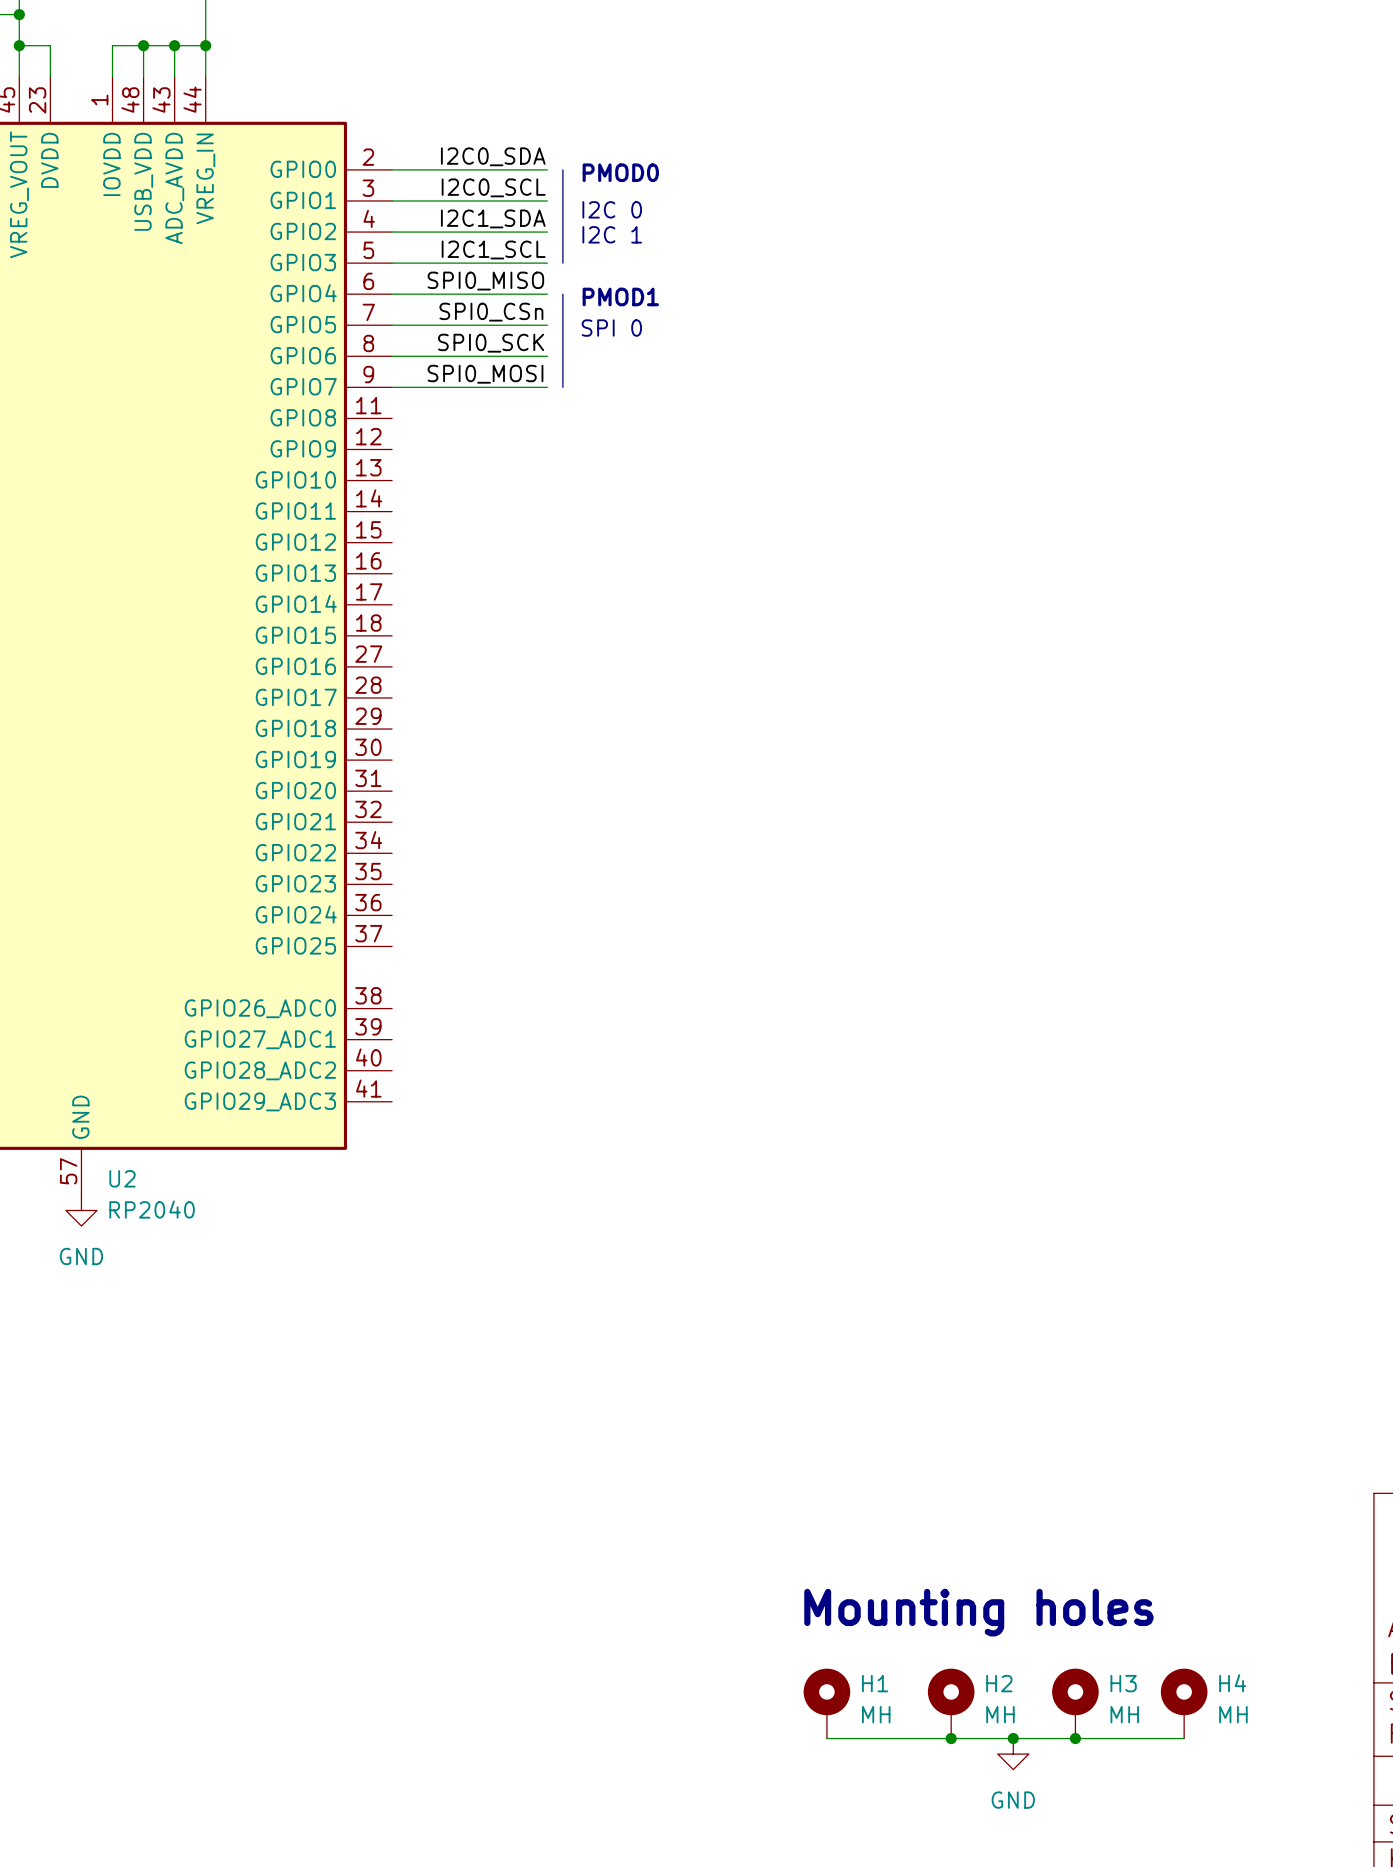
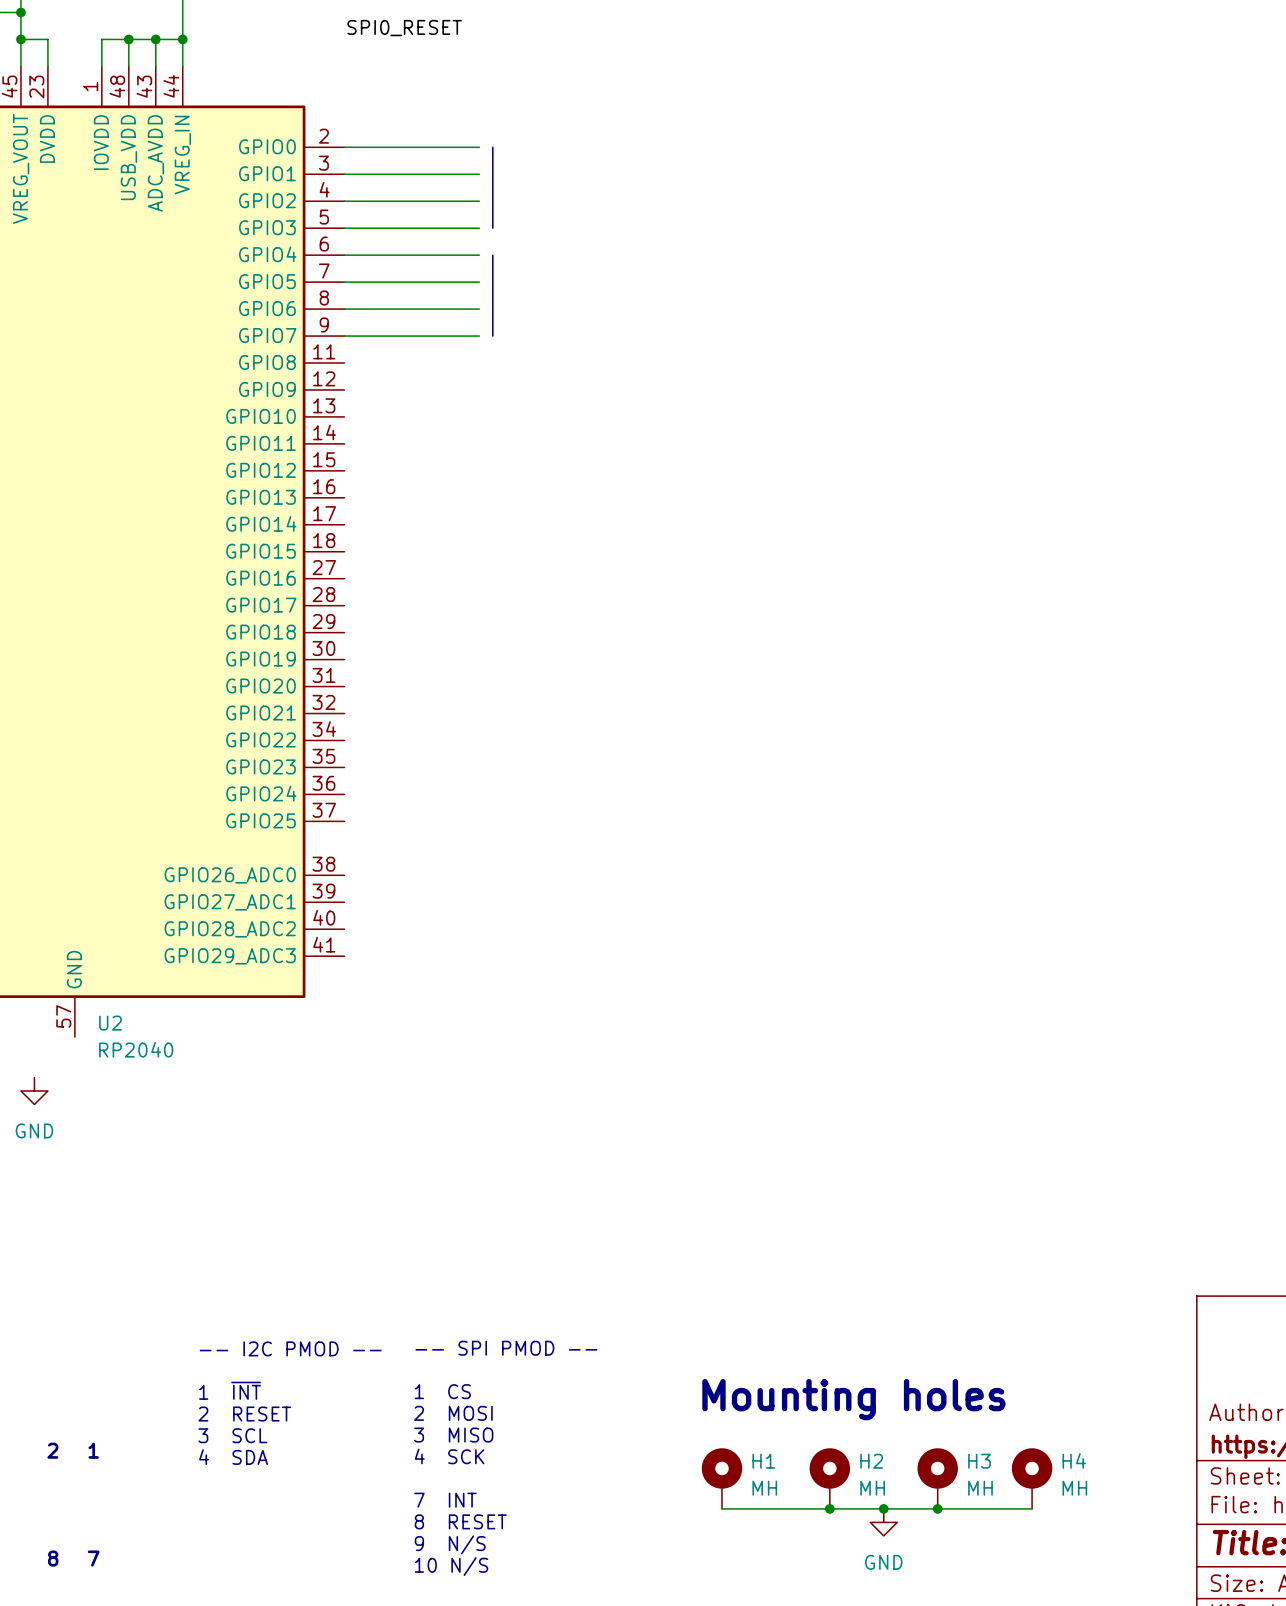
label: none -> SPI0_RESET (404, 28)
label: I2C0_SDA (493, 156) -> none
text: PMOD0 (620, 172) -> none
label: I2C0_SCL (493, 187) -> none
text: I2C 0 (612, 209) -> none
label: I2C1_SDA (493, 218) -> none
text: I2C 1 (612, 234) -> none
label: I2C1_SCL (493, 249) -> none
label: SPI0_MISO (485, 281) -> none
text: PMOD1 (620, 296) -> none
label: SPI0_CSn (491, 312) -> none
text: SPI 0 (611, 328) -> none
label: SPI0_SCK (491, 343) -> none
label: SPI0_MOSI (485, 374) -> none
power symbol position: GND (81, 1210) -> GND (34, 1091)
text: none -> -- SPI PMOD -- (506, 1348)
text: none -> -- I2C PMOD -- (290, 1348)
text: none -> 1 ~{INT} (230, 1390)
text: none -> 1 CS (442, 1391)
text: none -> 2 MOSI (453, 1413)
text: none -> 2 RESET (244, 1414)
text: none -> 3 MISO (453, 1435)
text: none -> 3 SCL (232, 1435)
text: none -> 2 (52, 1450)
text: none -> 1 (93, 1450)
text: none -> 4 SDA (233, 1457)
text: none -> 4 SCK (449, 1456)
text: none -> 7 INT (445, 1500)
text: none -> 8 RESET (460, 1521)
text: none -> 9 N/S (450, 1544)
text: none -> 8 (53, 1558)
text: none -> 7 (93, 1558)
text: none -> 10 N/S (451, 1566)

